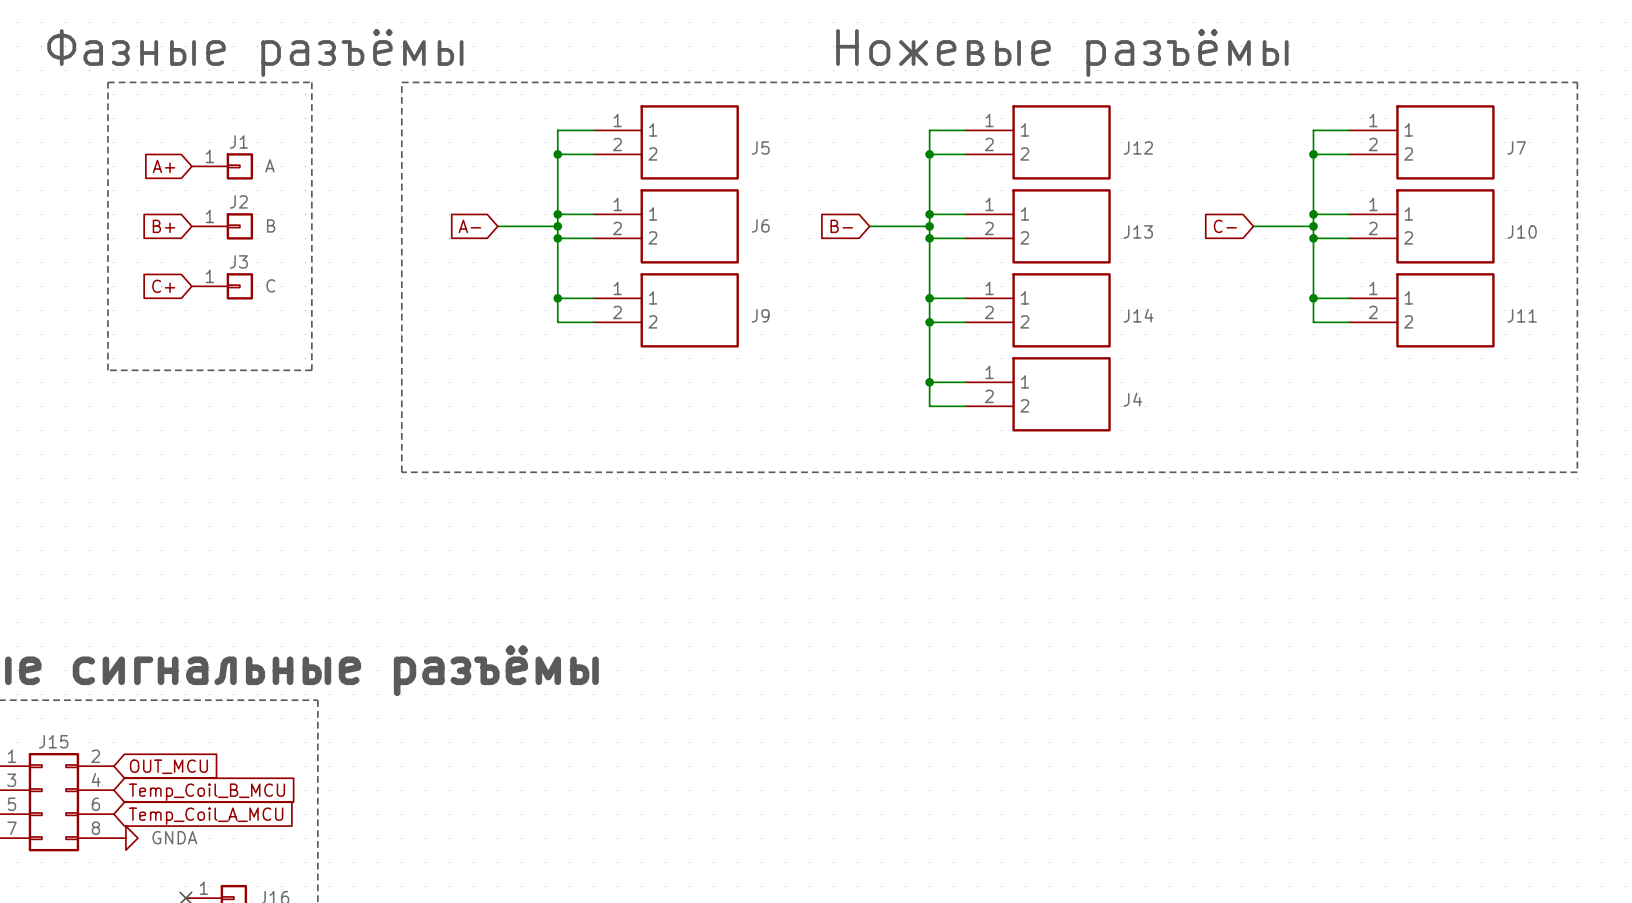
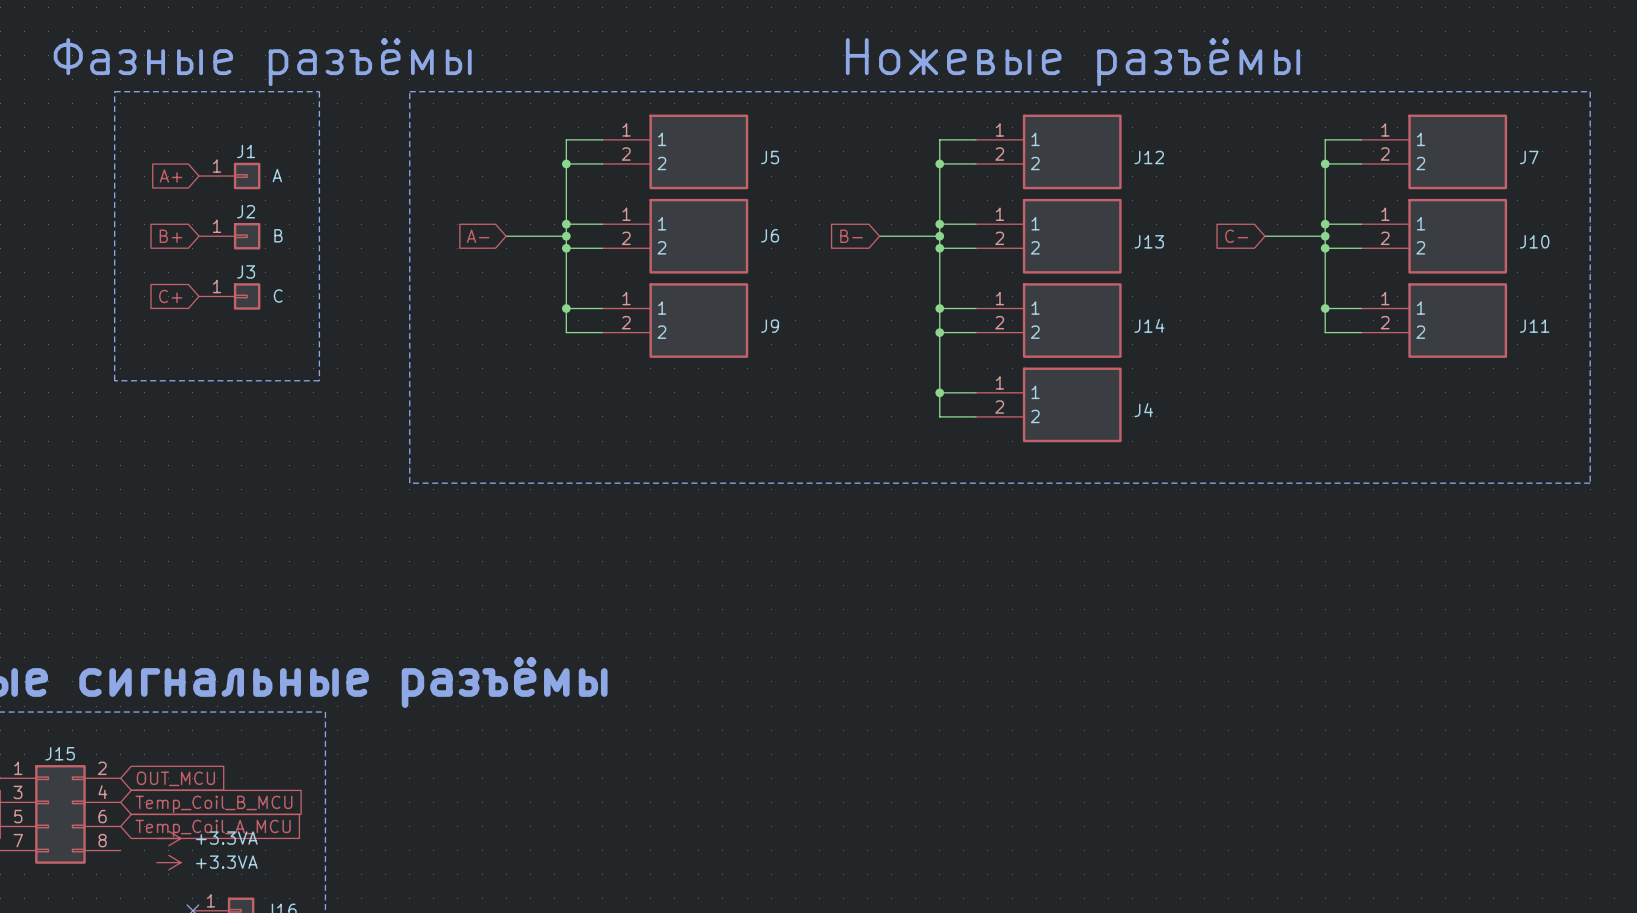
power symbol: none -> +3.3VA (168, 838)
power symbol: GNDA (125, 838) -> none
power symbol: none -> +3.3VA (168, 862)

